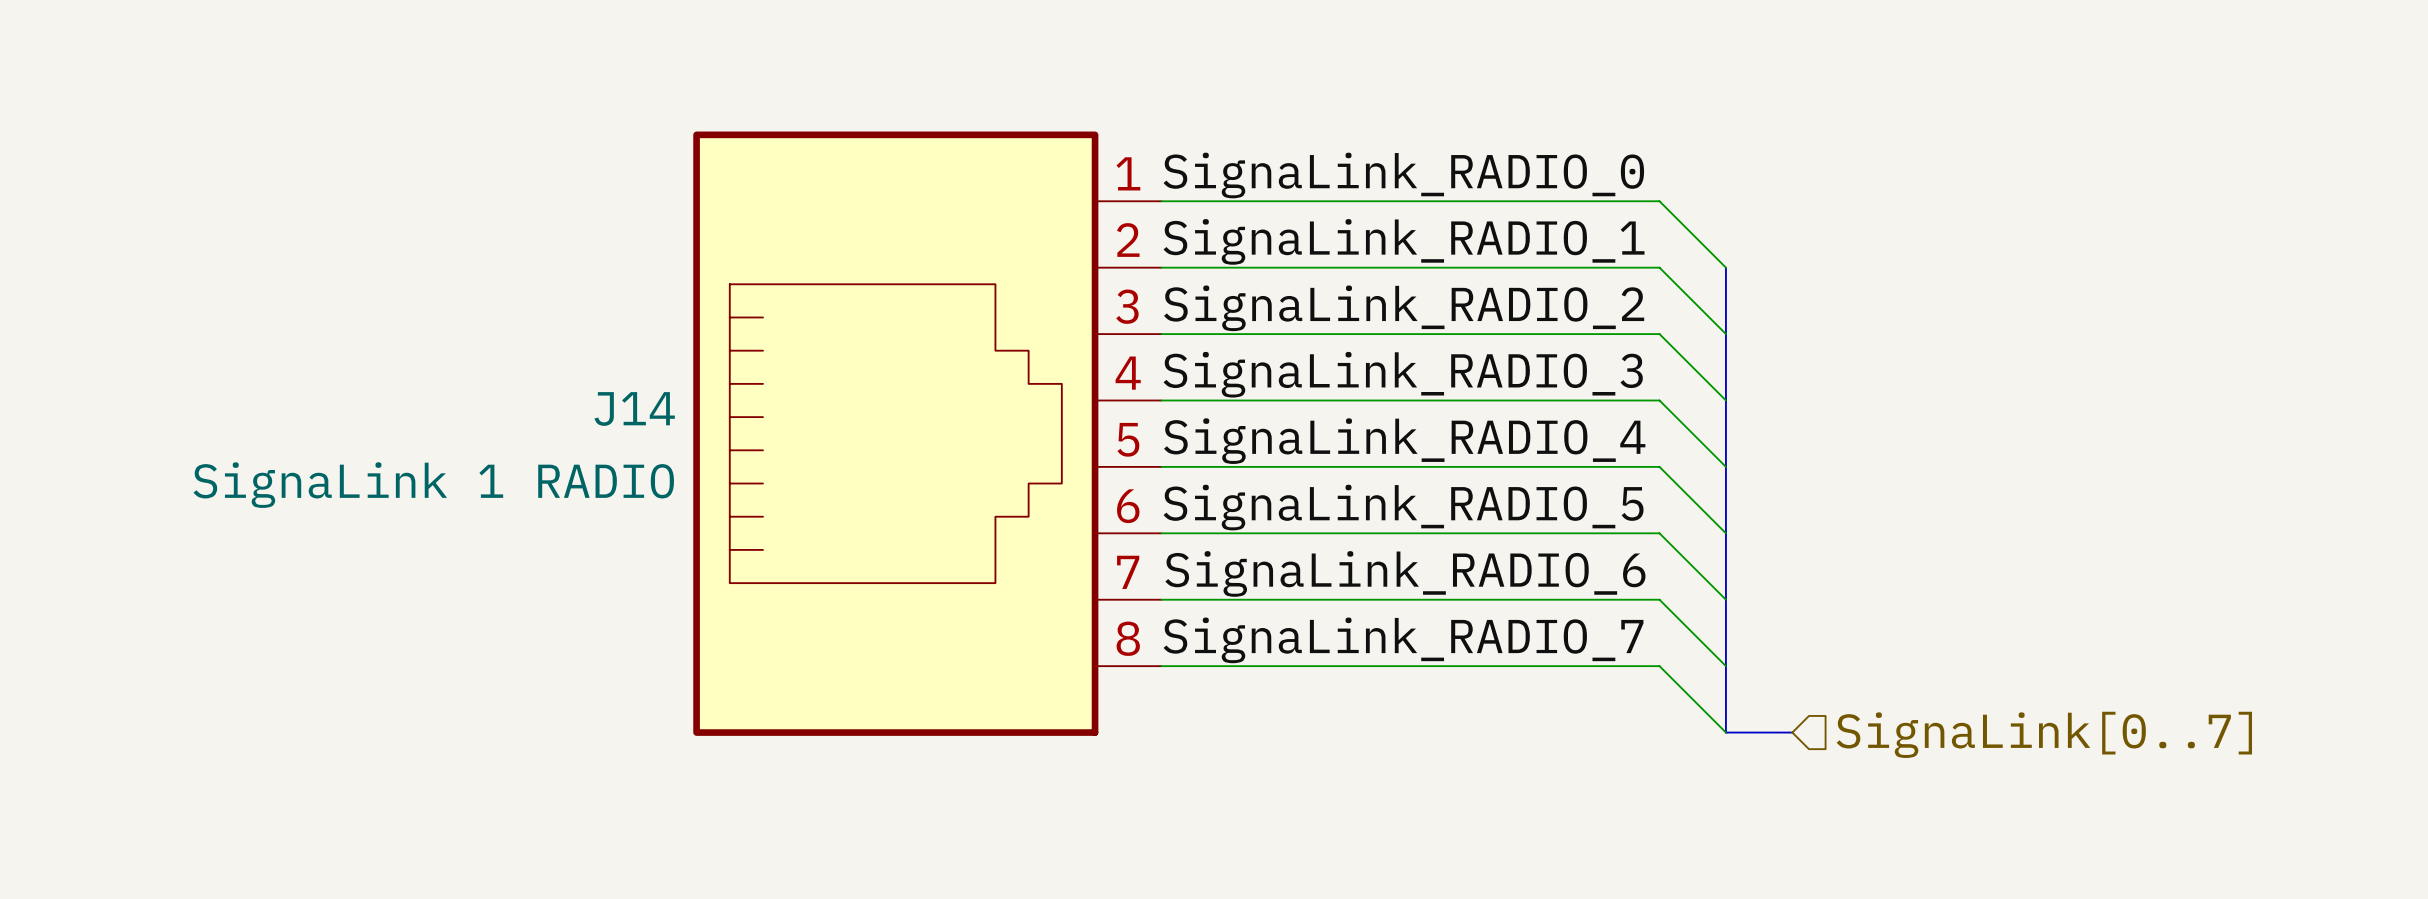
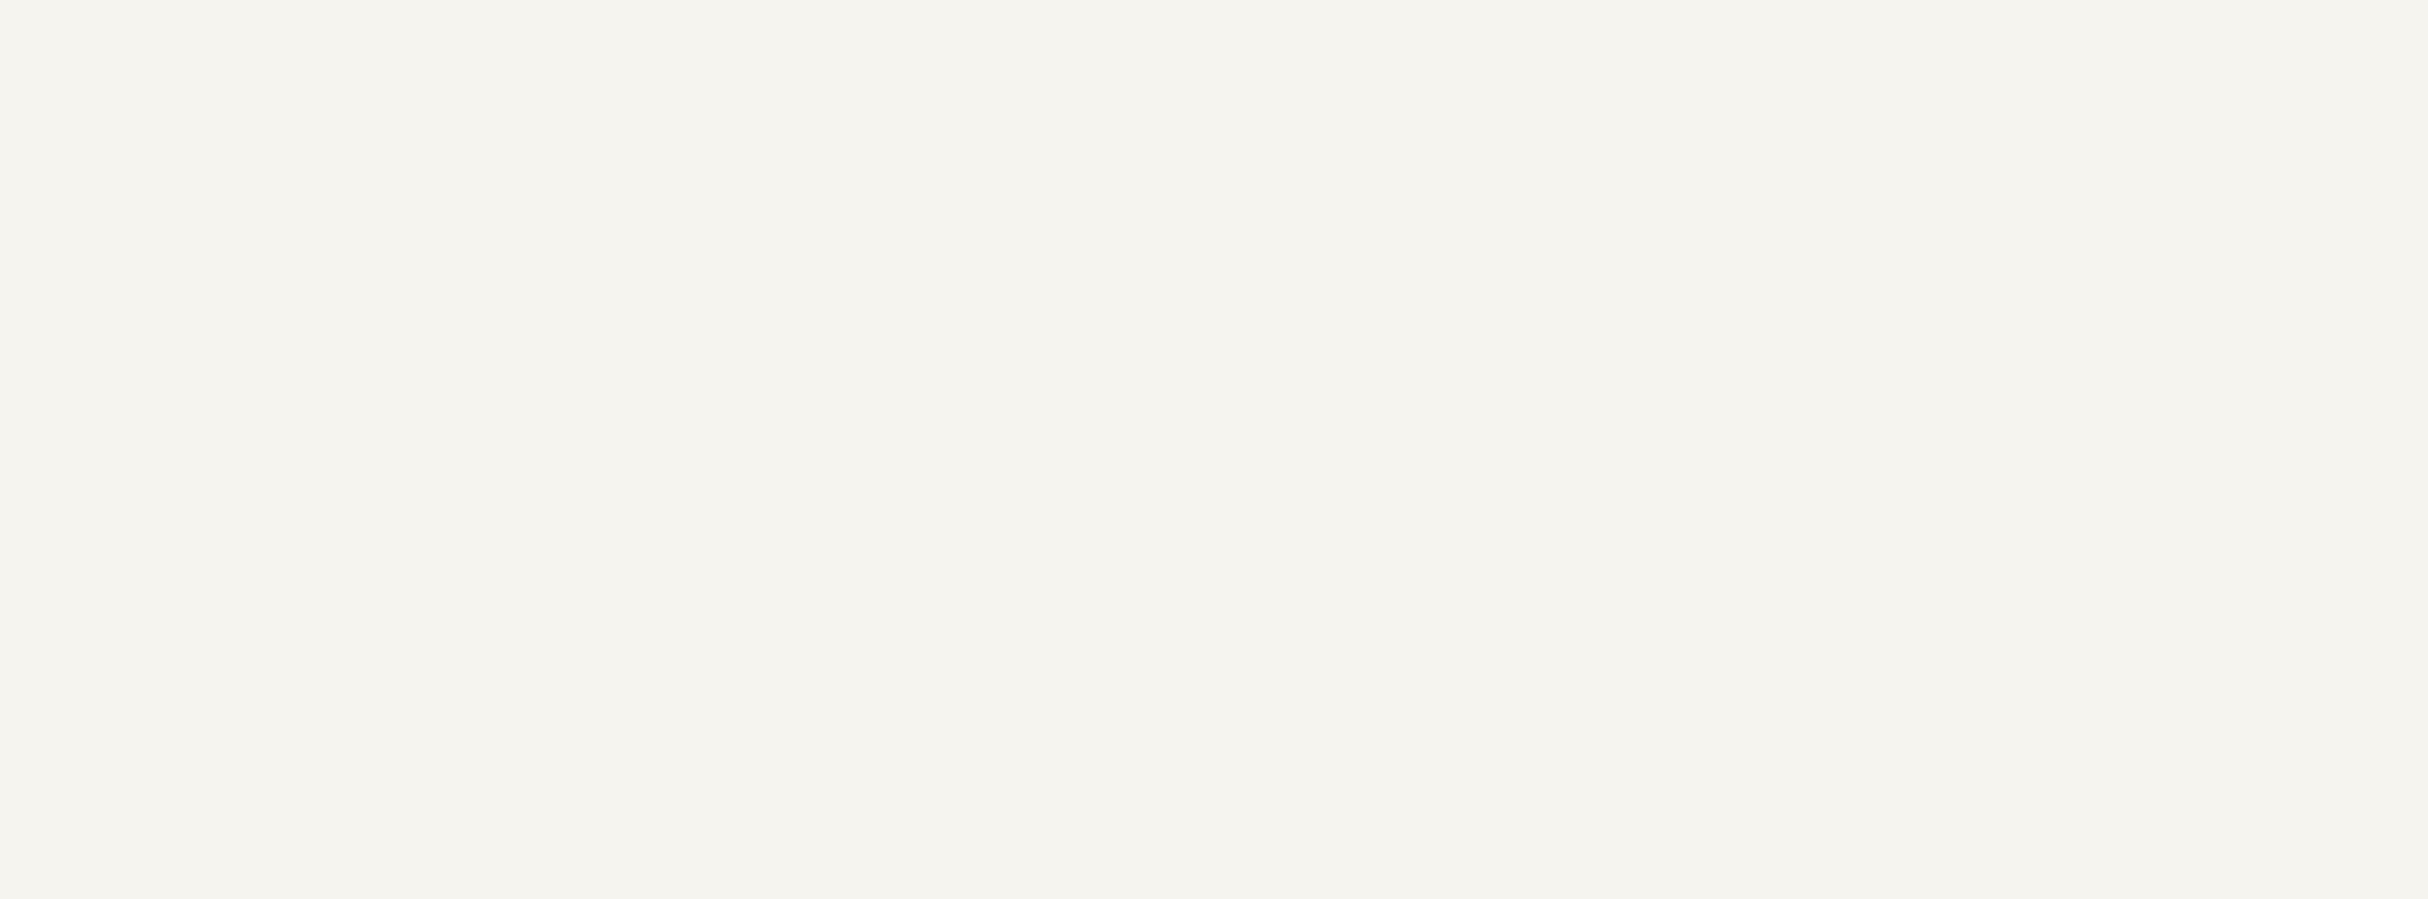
label: SignaLink_RADIO_0 (1403, 175) -> none
wire: (1161, 201) (1659, 201) (1725, 267) -> none
label: SignaLink_RADIO_1 (1404, 241) -> none
wire: (1161, 267) (1659, 267) (1725, 334) -> none
bus: (1725, 267) (1725, 732) (1792, 732) -> none
label: SignaLink_RADIO_2 (1404, 308) -> none
wire: (1161, 334) (1659, 334) (1725, 400) -> none
label: SignaLink_RADIO_3 (1403, 374) -> none
wire: (1161, 400) (1659, 400) (1725, 466) -> none
J14: SignaLink 1 RADIO (927, 433) -> none
label: SignaLink_RADIO_4 (1404, 441) -> none
wire: (1161, 466) (1659, 466) (1725, 533) -> none
label: SignaLink_RADIO_5 (1403, 507) -> none
wire: (1161, 533) (1659, 533) (1725, 599) -> none
label: SignaLink_RADIO_6 (1405, 573) -> none
wire: (1161, 599) (1659, 599) (1725, 666) -> none
label: SignaLink_RADIO_7 (1403, 640) -> none
wire: (1161, 666) (1659, 666) (1725, 732) -> none
hierarchical label: SignaLink[0..7] (2044, 734) -> none

